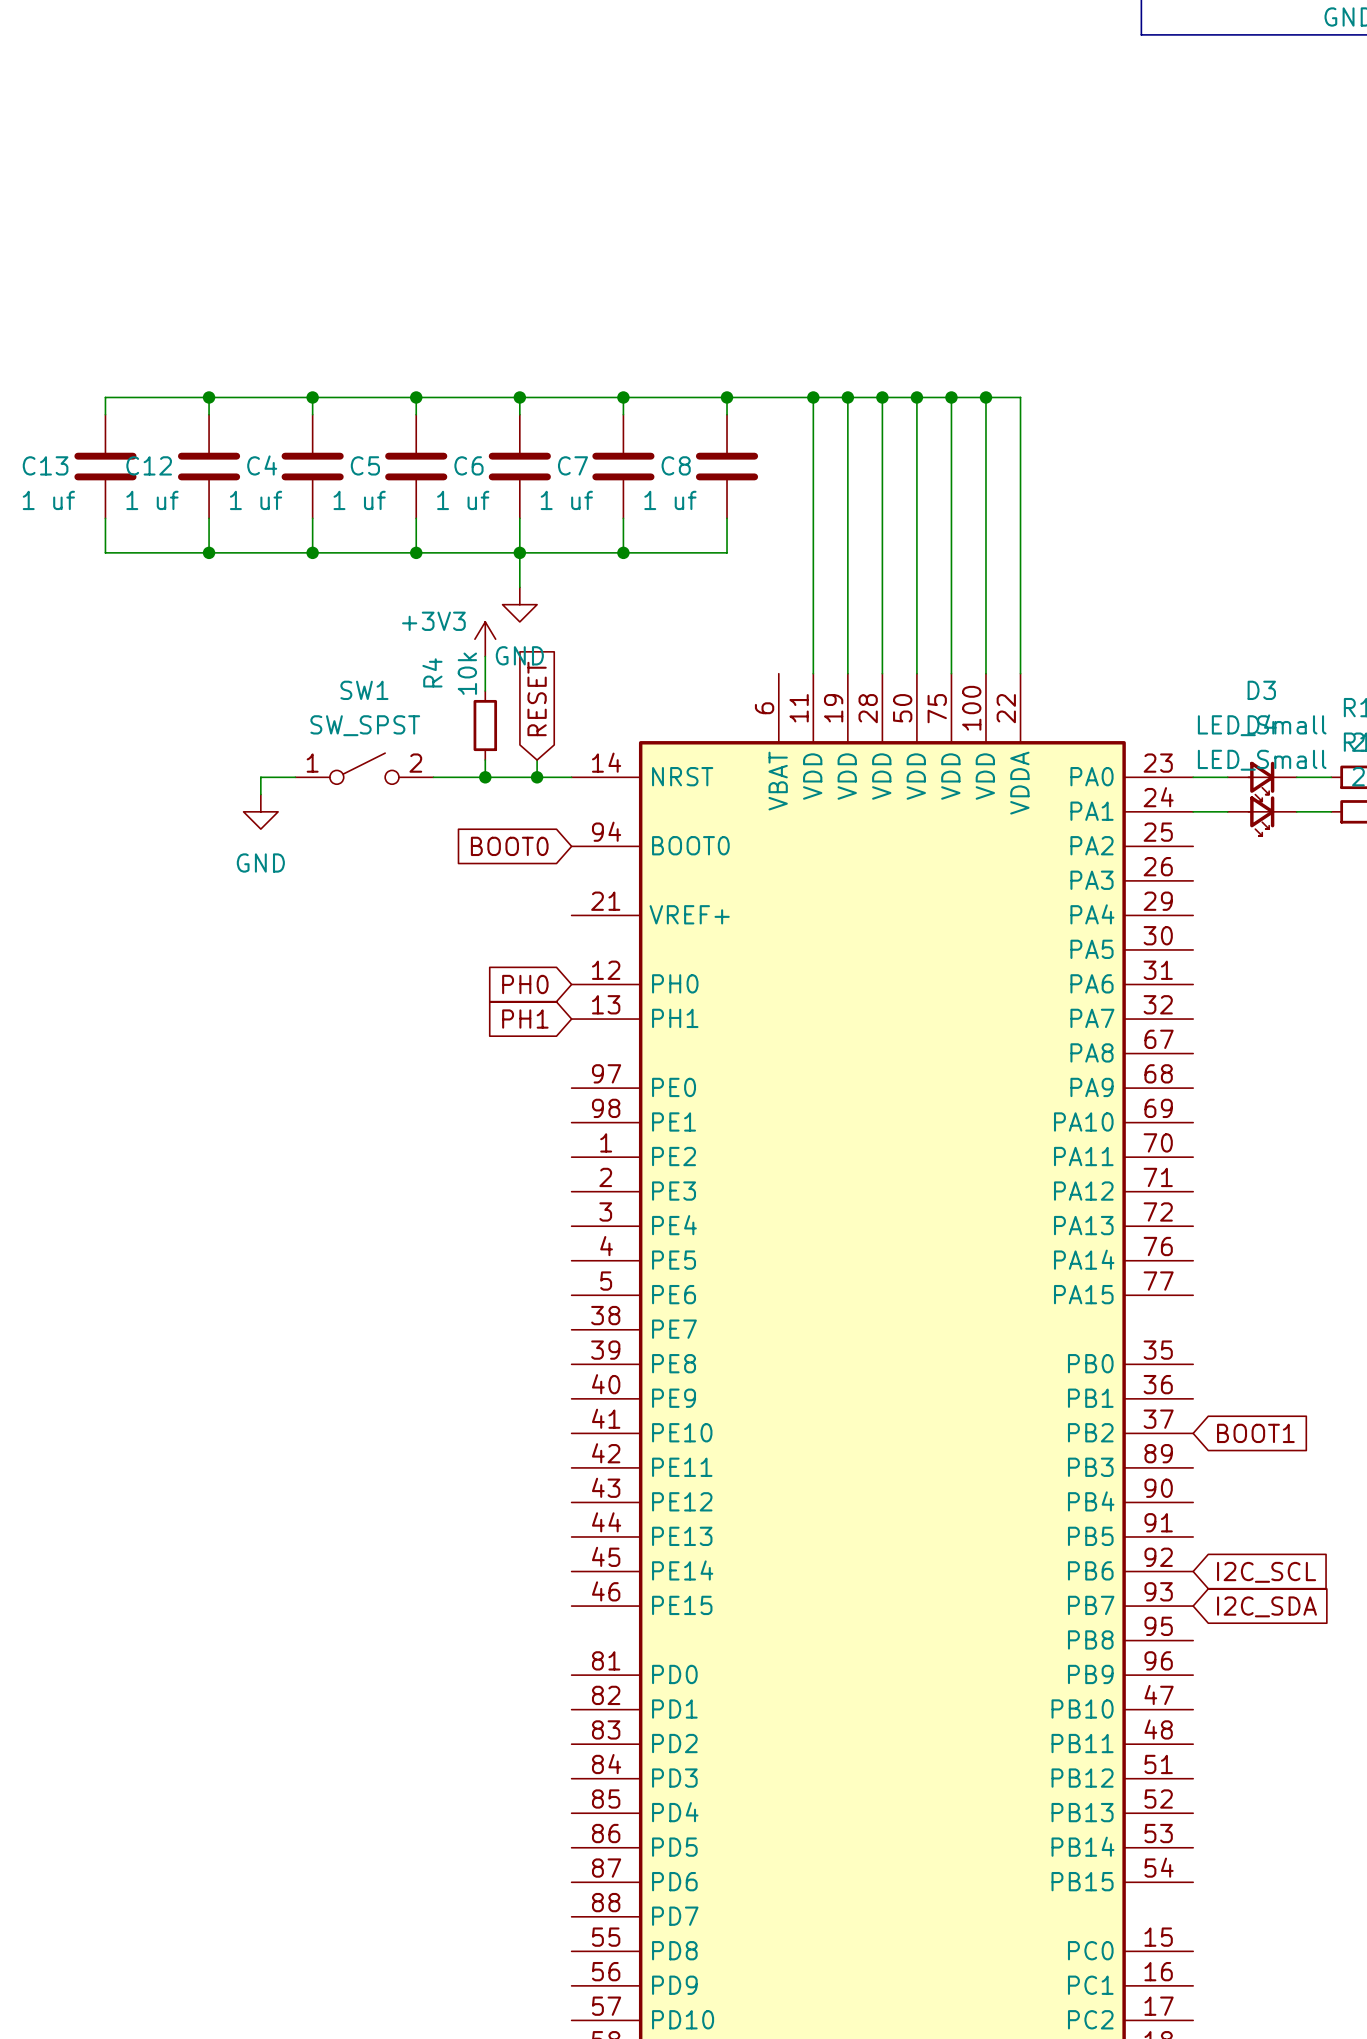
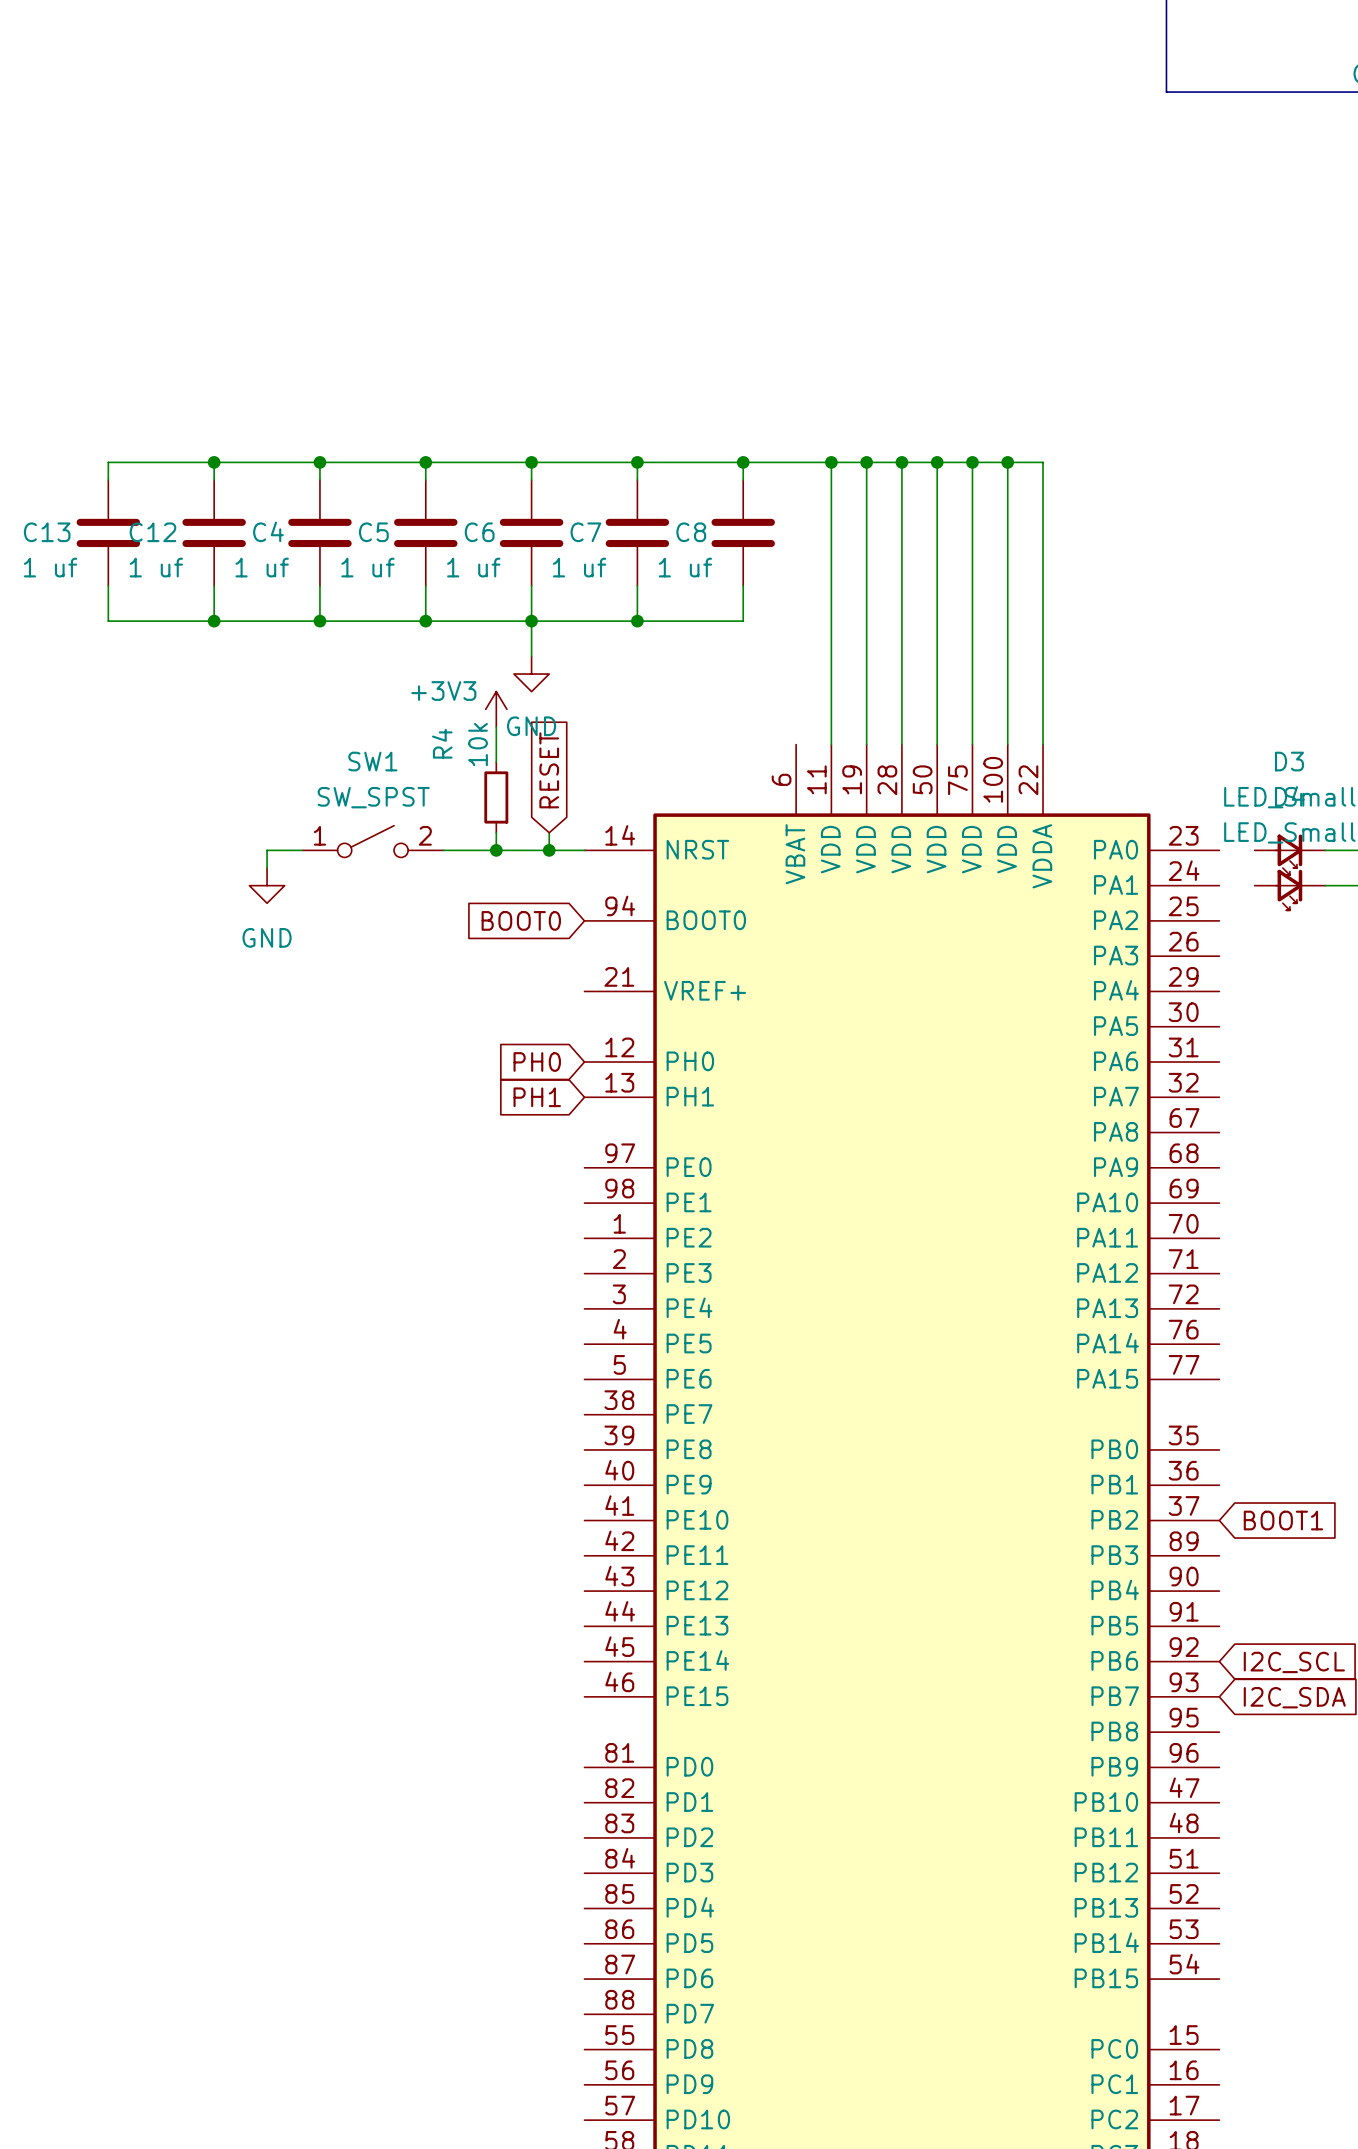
wire: (1193, 777) (1227, 777) -> none
wire: (1193, 811) (1227, 811) -> none

